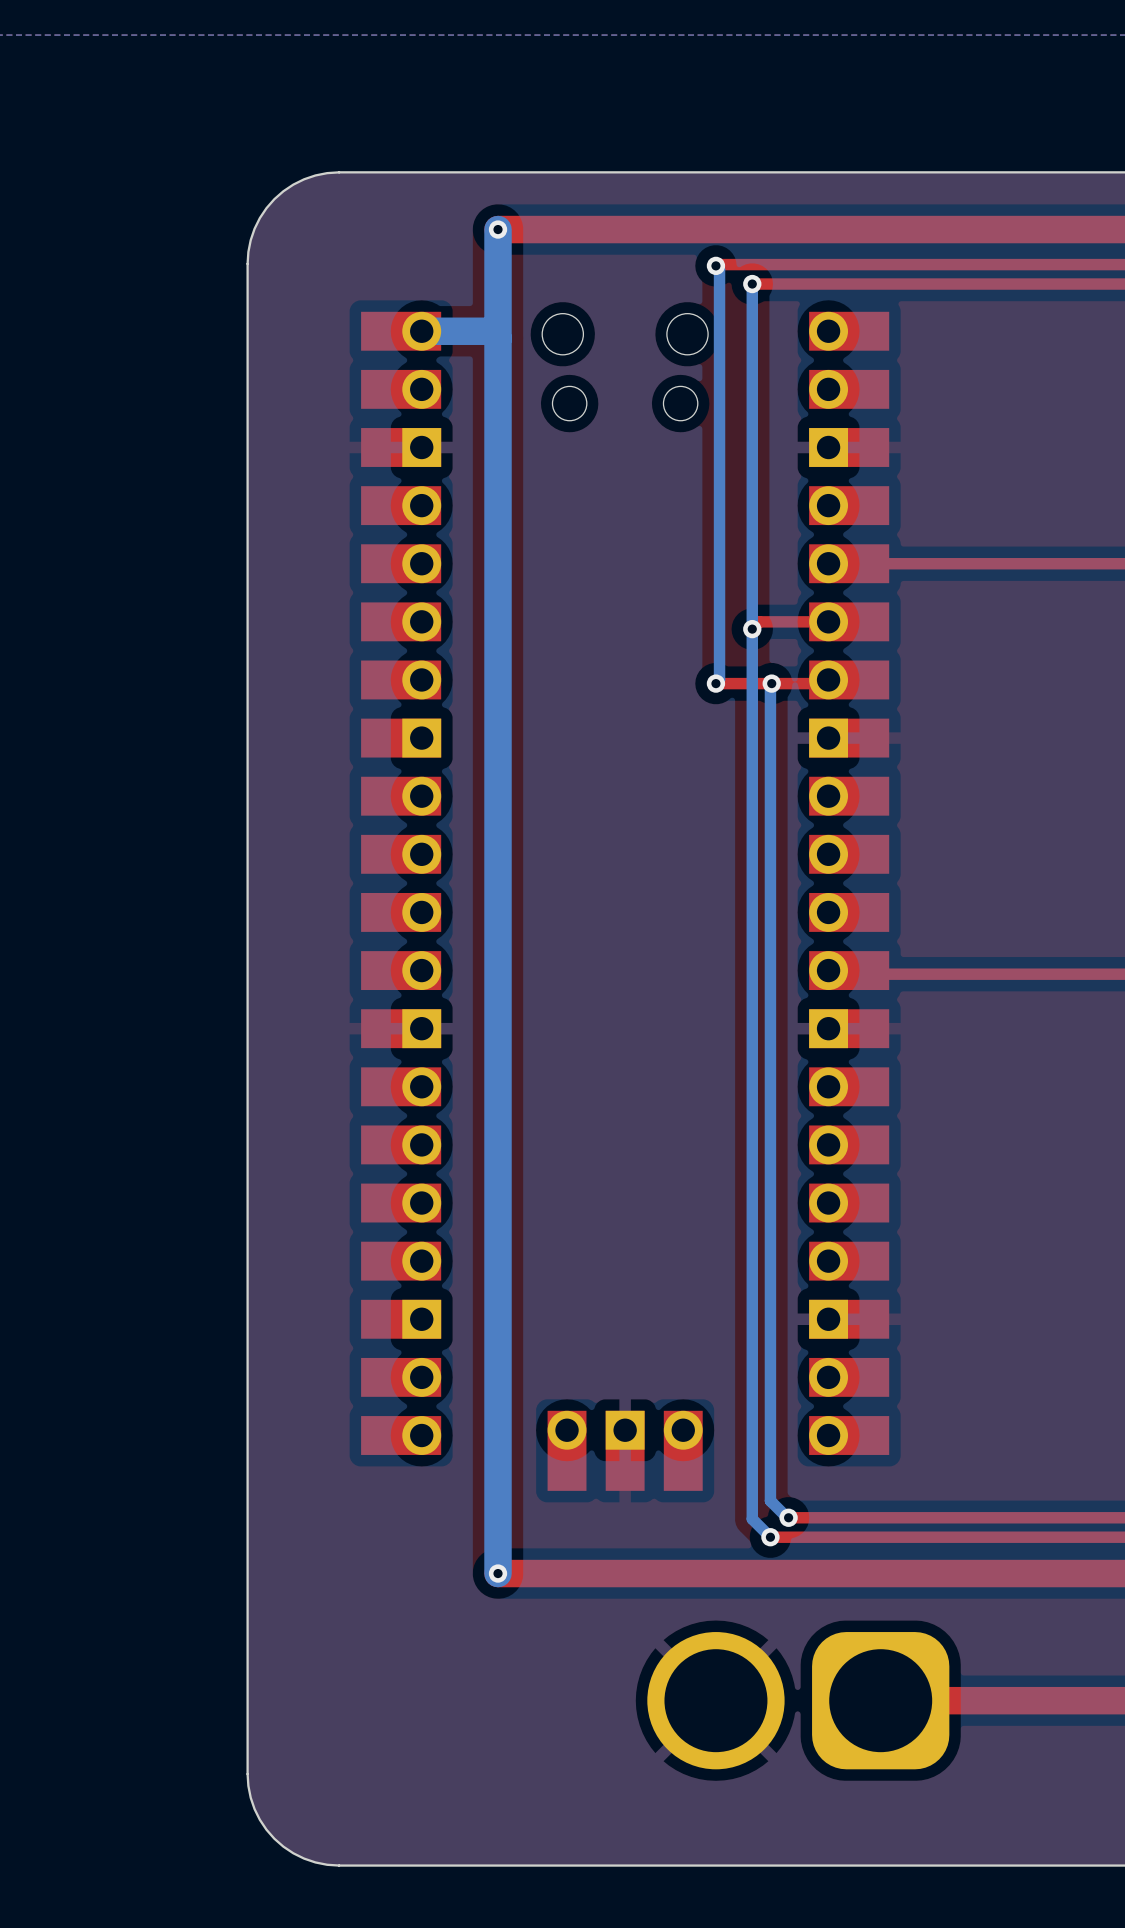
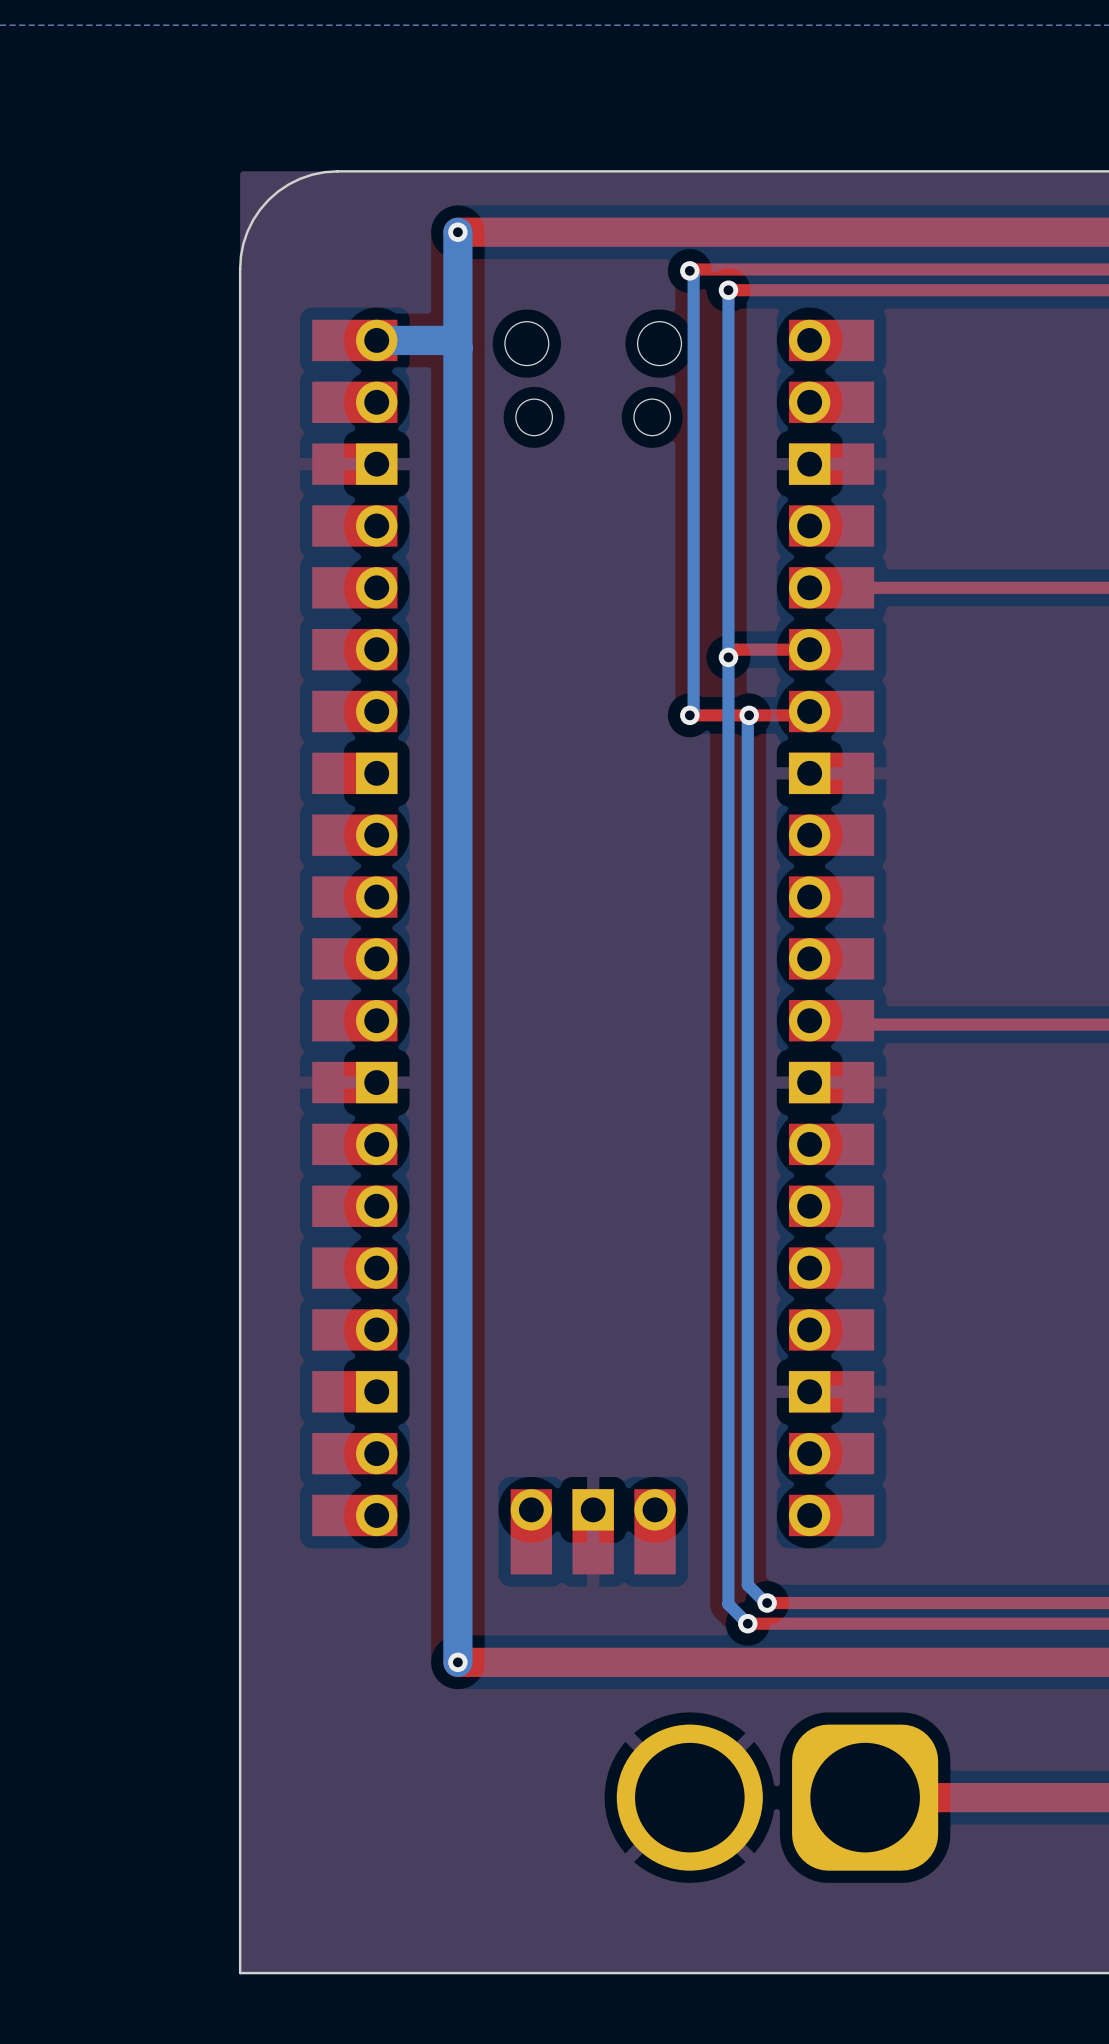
board edge: (384, 172) (327, 173) (315, 175) (293, 184) (274, 199) (259, 218) (250, 240) (247, 263) (247, 1774) (250, 1797) (254, 1809) (259, 1819) (274, 1838) (293, 1853) (304, 1858) (315, 1862) (339, 1865) -> (337, 171) (312, 174) (300, 178) (288, 184) (268, 199) (253, 220) (247, 231) (243, 243) (240, 268) (240, 1973) (288, 1973)

